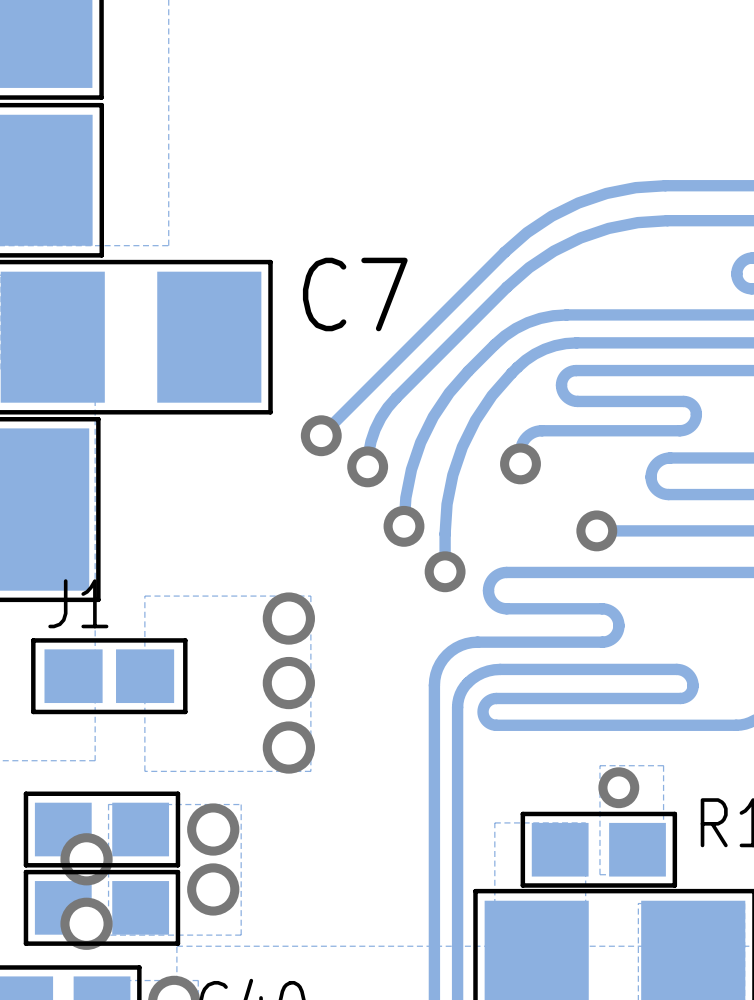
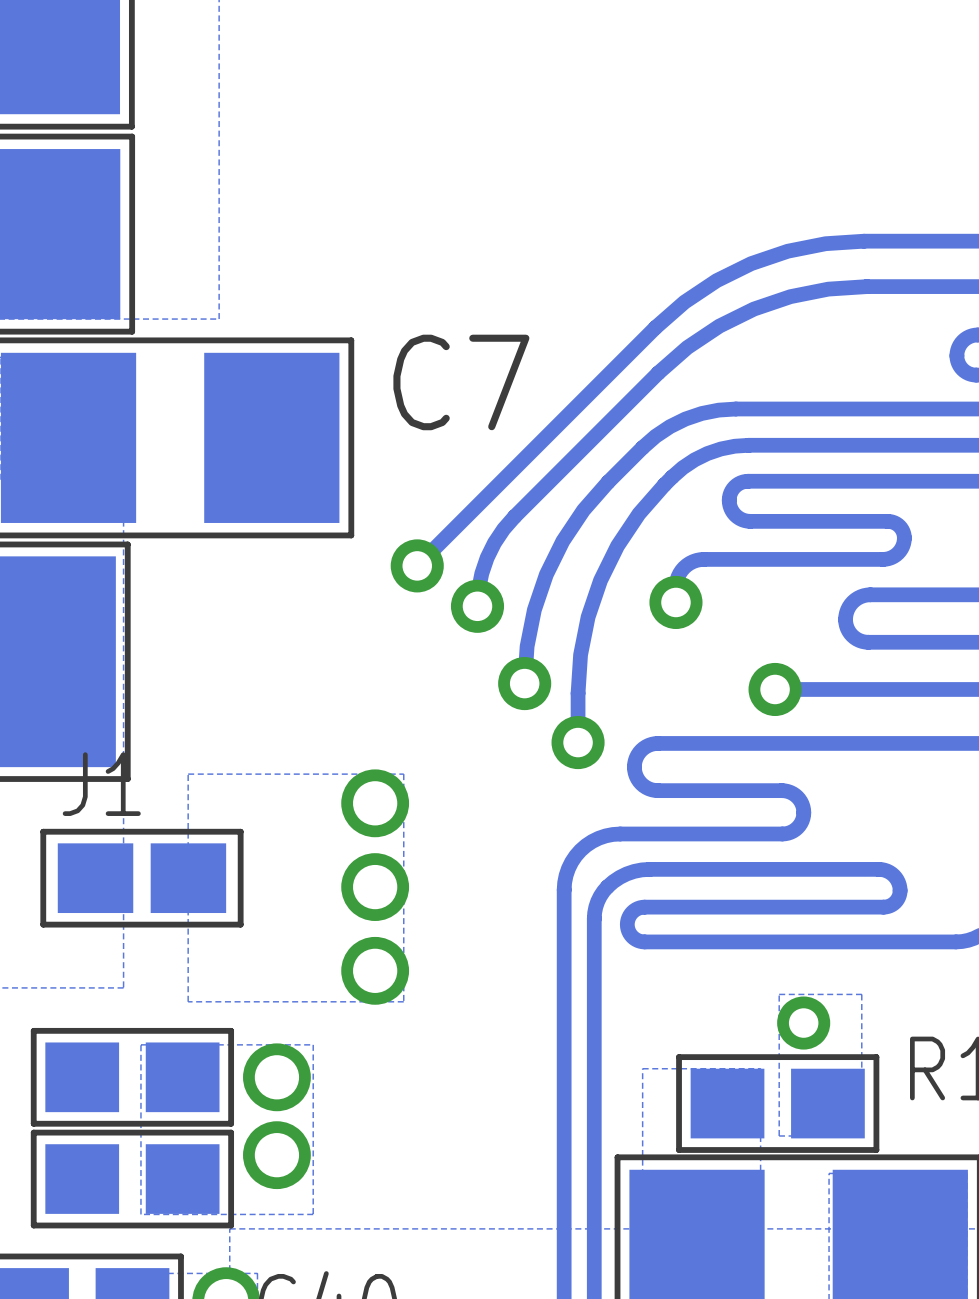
via: (86, 859) -> none
via: (86, 923) -> none

